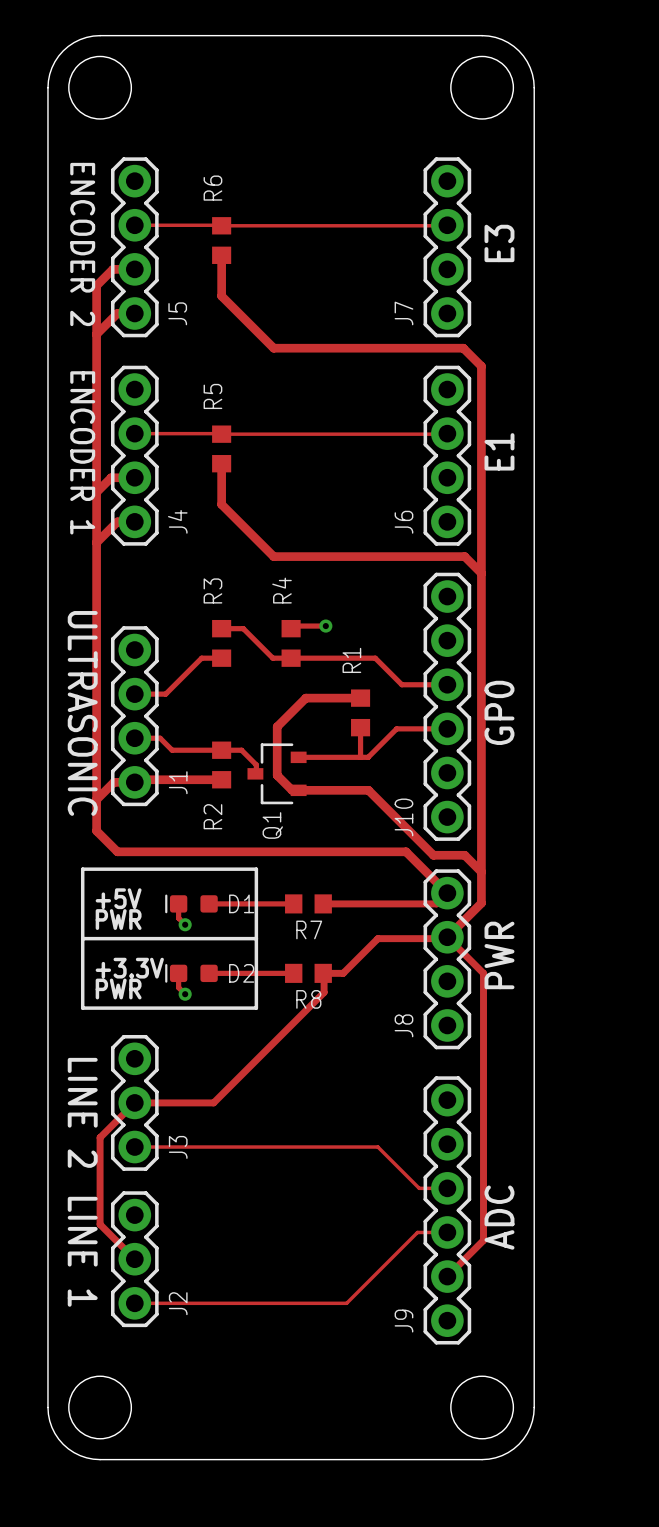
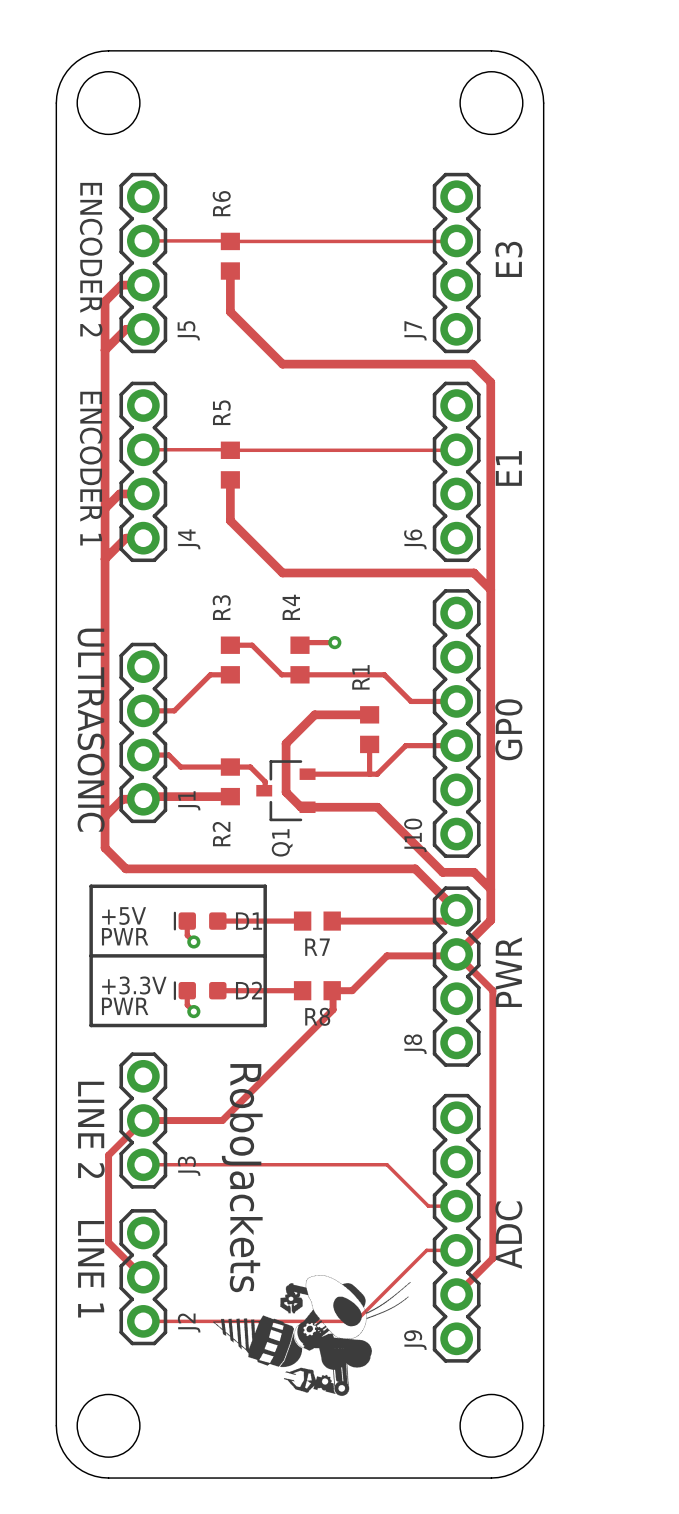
text: none -> RoboJackets (242, 1178)
drawing: none -> [213, 1275, 411, 1397]

